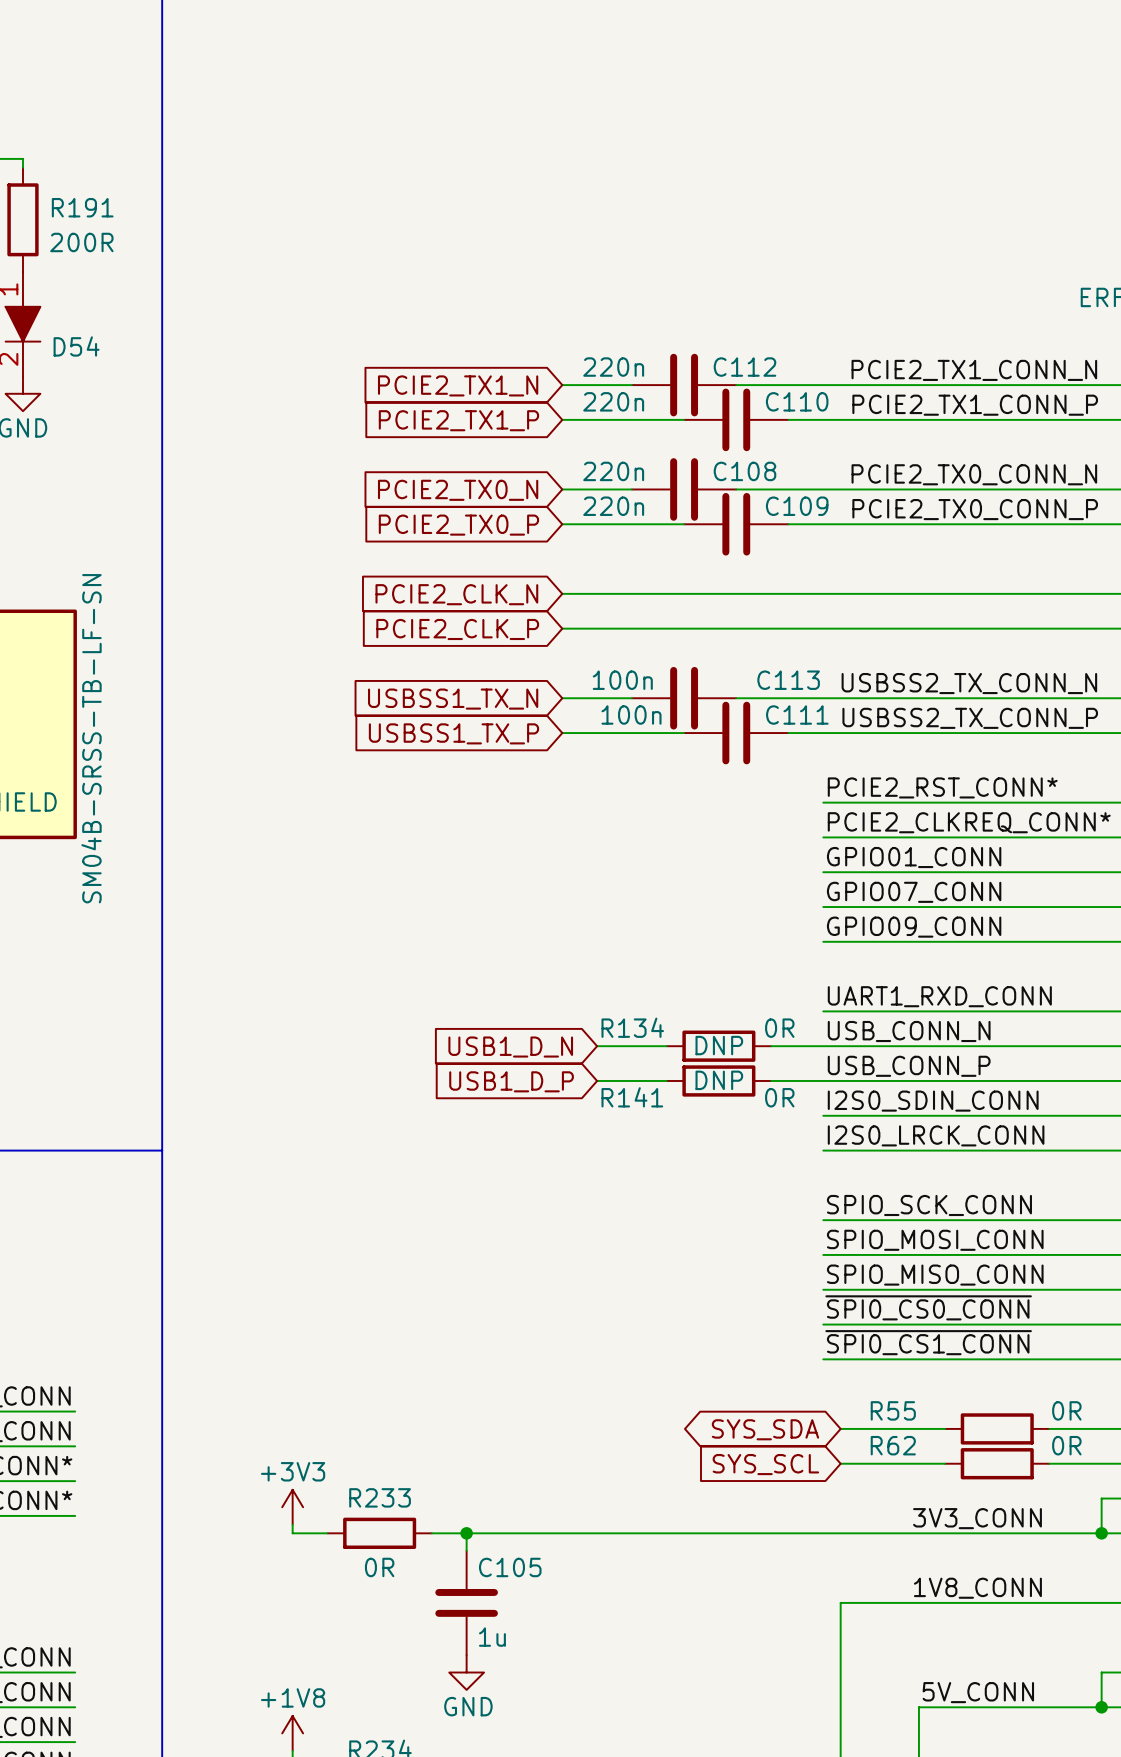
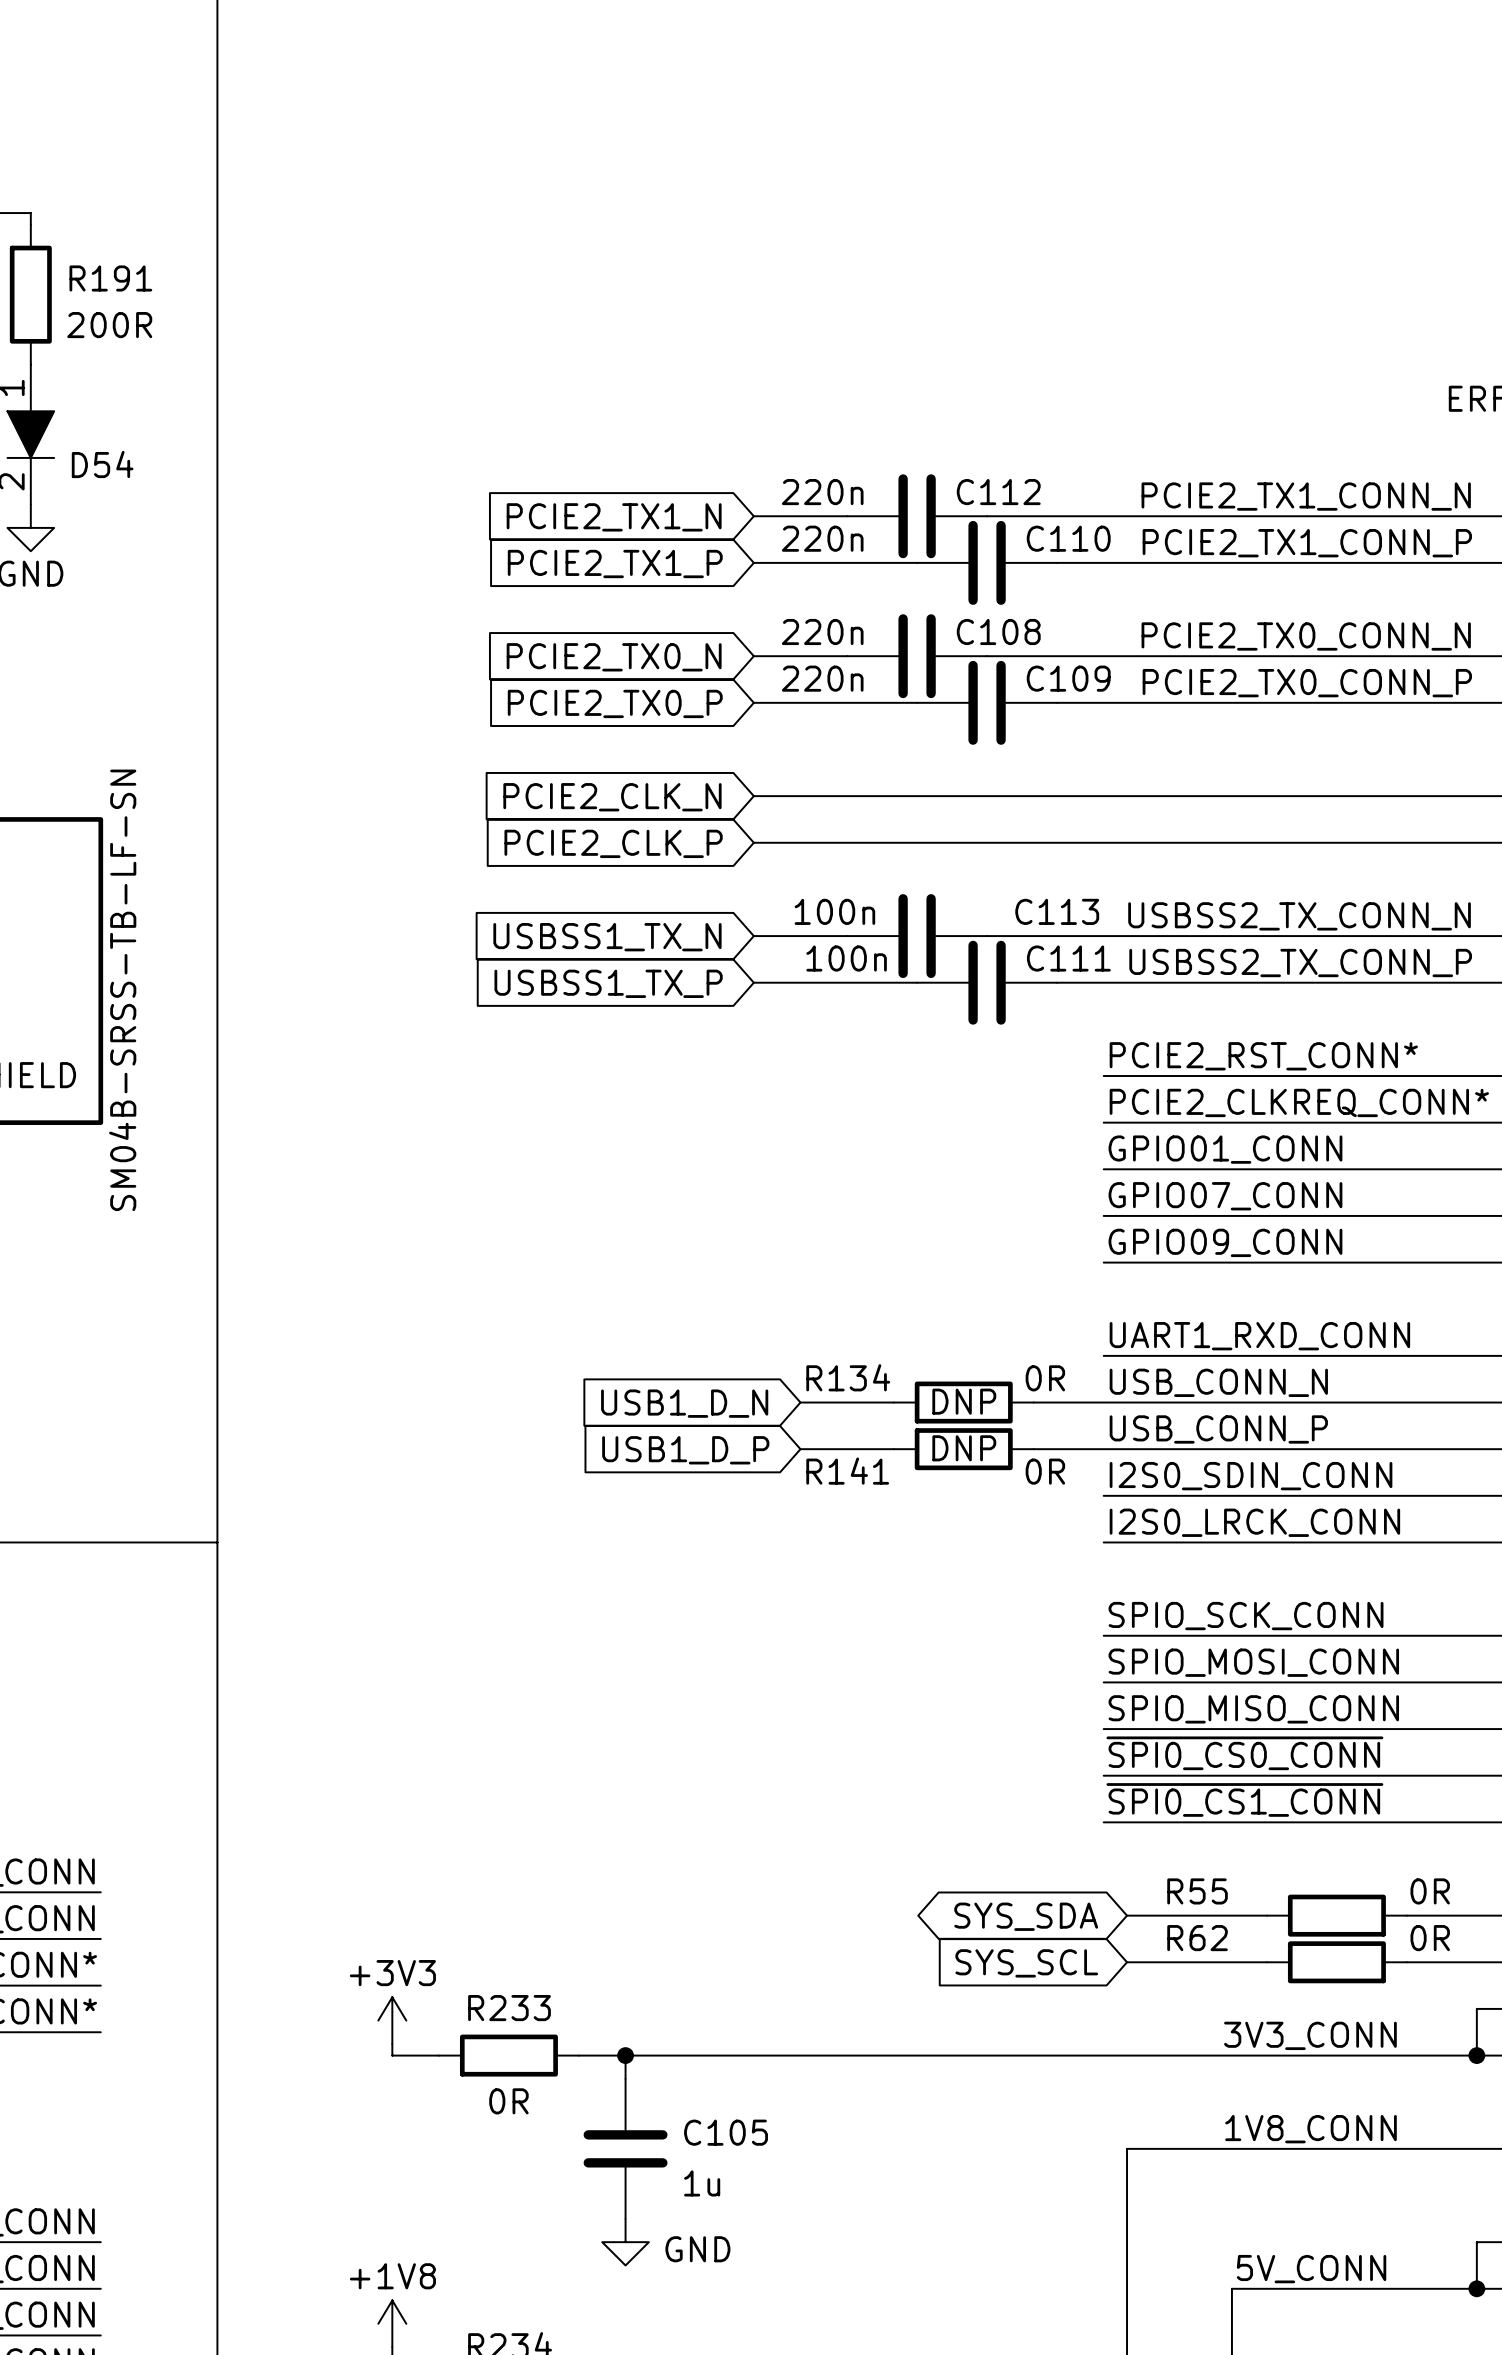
C105 name position: C105 (510, 1567) -> C105 (726, 2132)
C105 text position: 1u (492, 1637) -> 1u (702, 2183)
power symbol text position: GND (468, 1706) -> GND (697, 2249)

